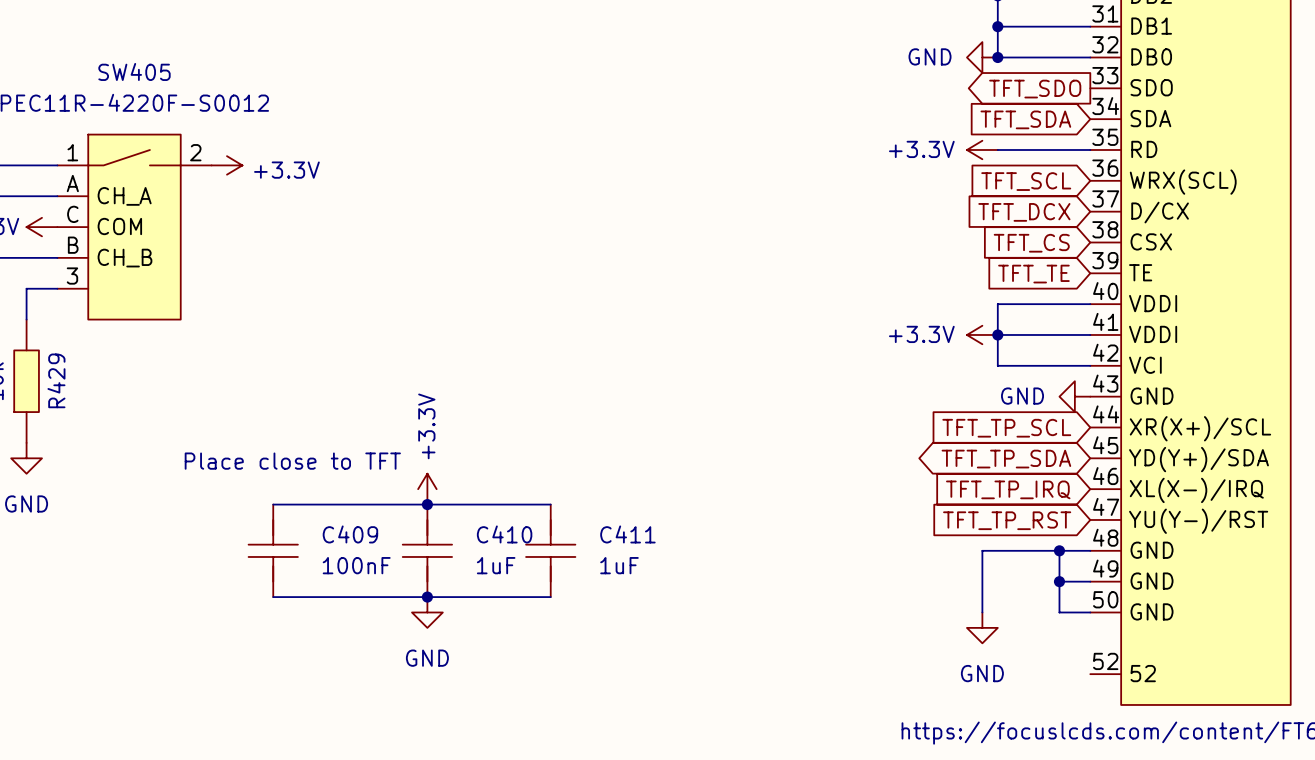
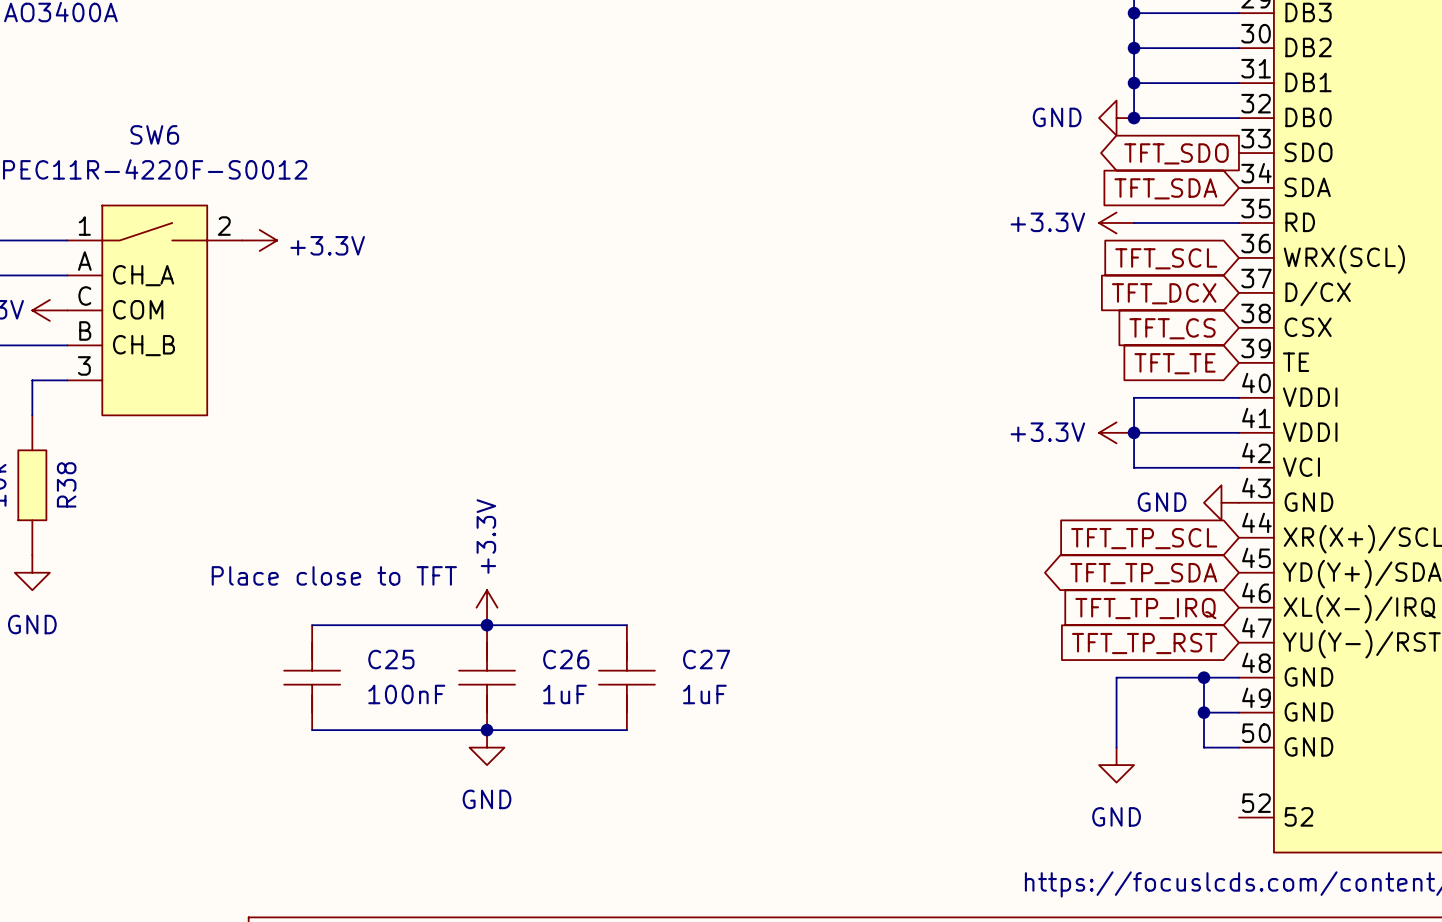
SW405 name: SW405 (134, 71) -> SW6 (154, 134)
R429 name: R429 (56, 380) -> R38 (66, 484)
C409 name: C409 (350, 534) -> C25 (391, 659)
C410 name: C410 (504, 534) -> C26 (566, 659)
C411 name: C411 (627, 534) -> C27 (706, 659)

